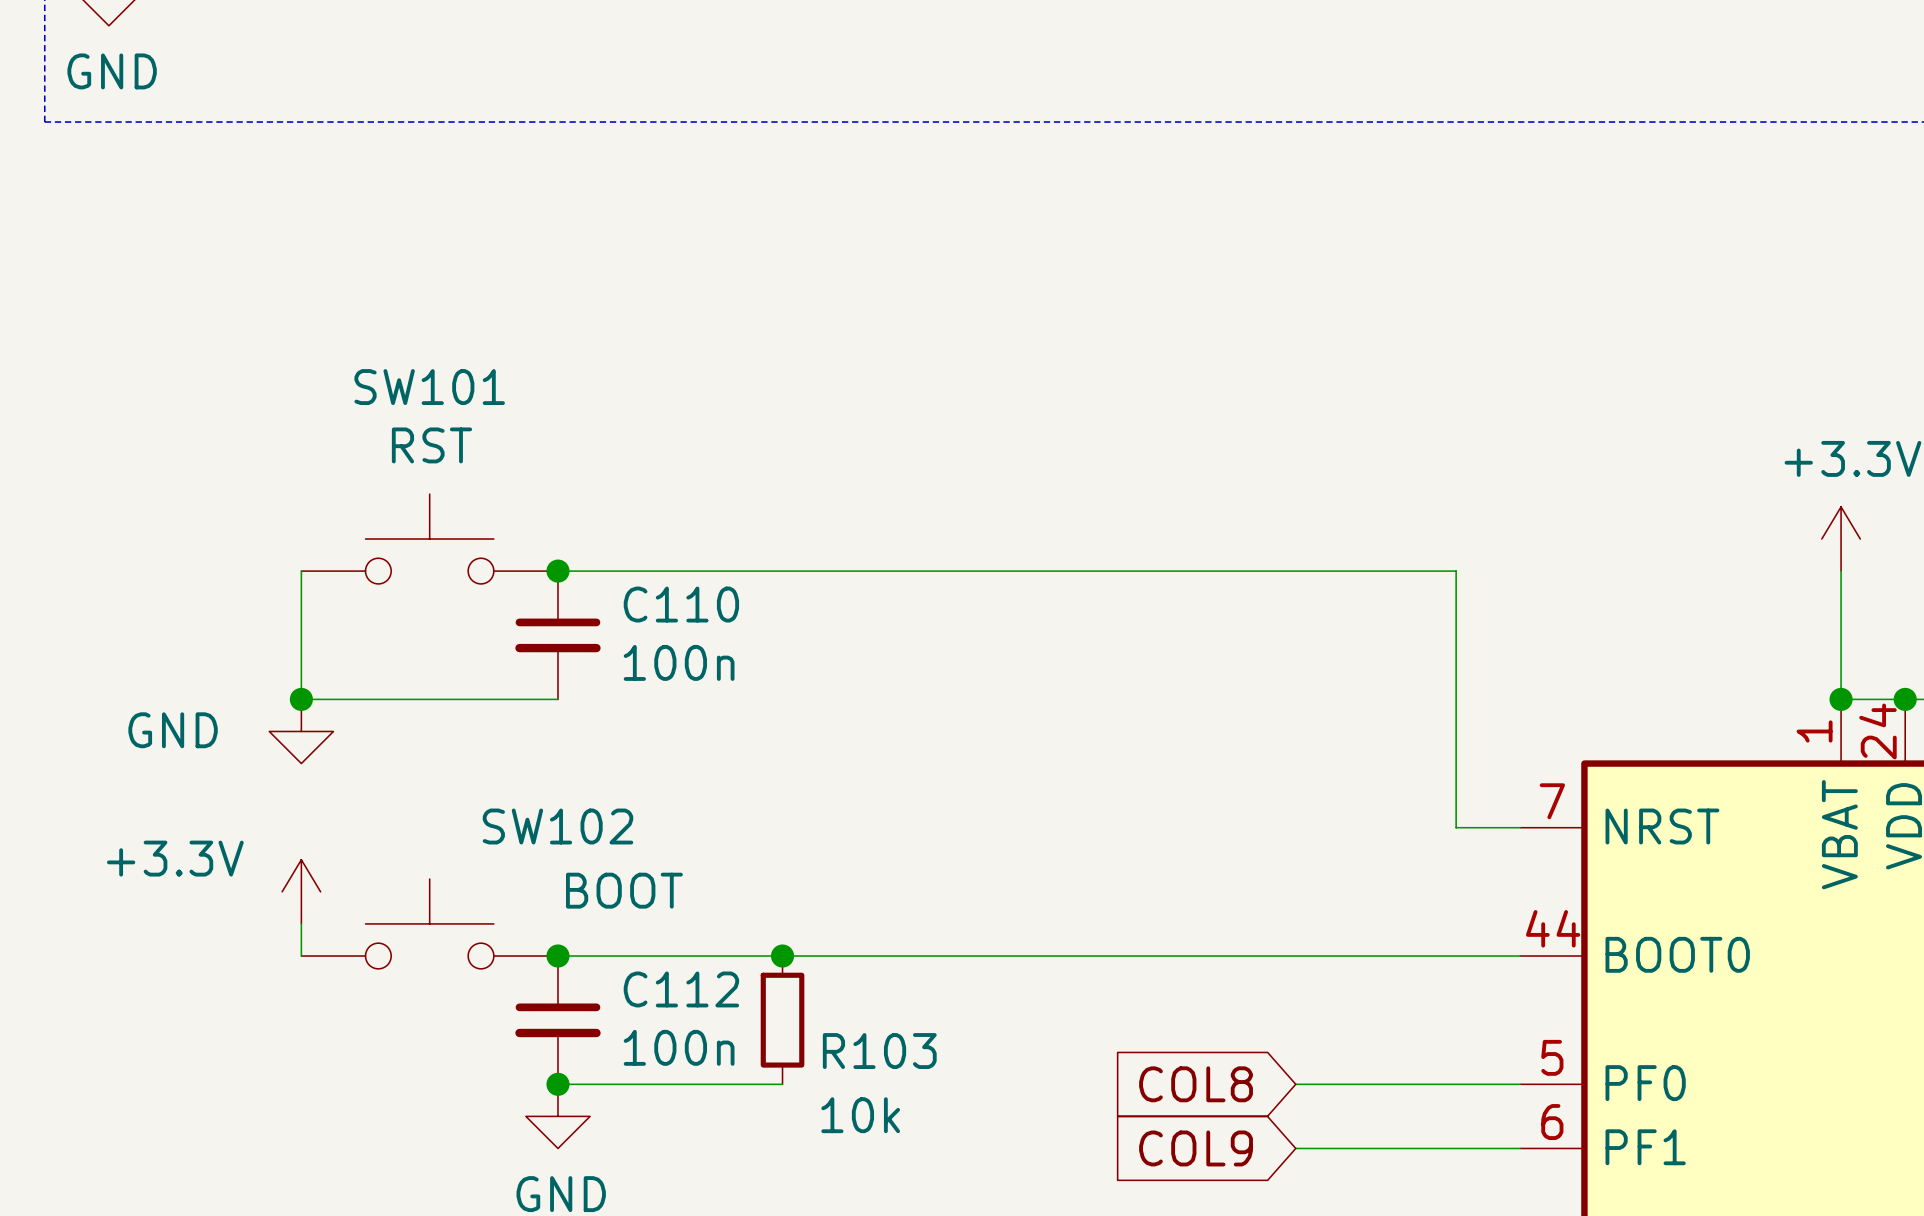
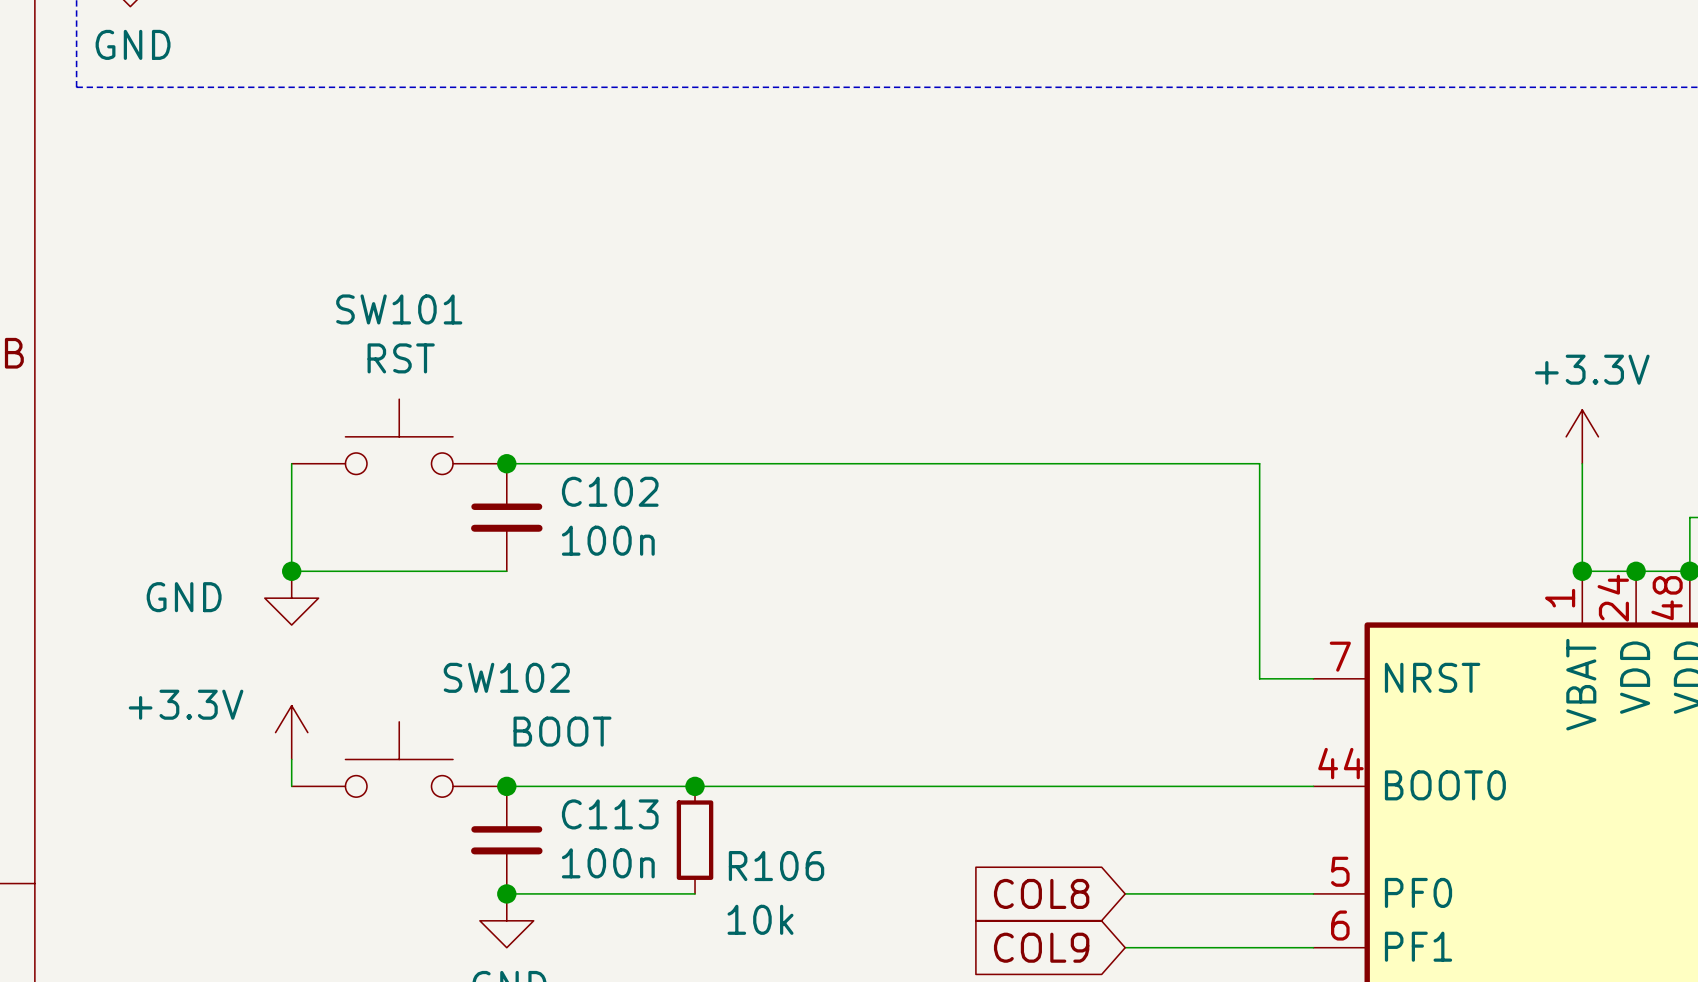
C110 name: C110 (681, 604) -> C102 (610, 491)
C112 name: C112 (681, 989) -> C113 (610, 814)
R103 name: R103 (879, 1051) -> R106 (776, 866)

